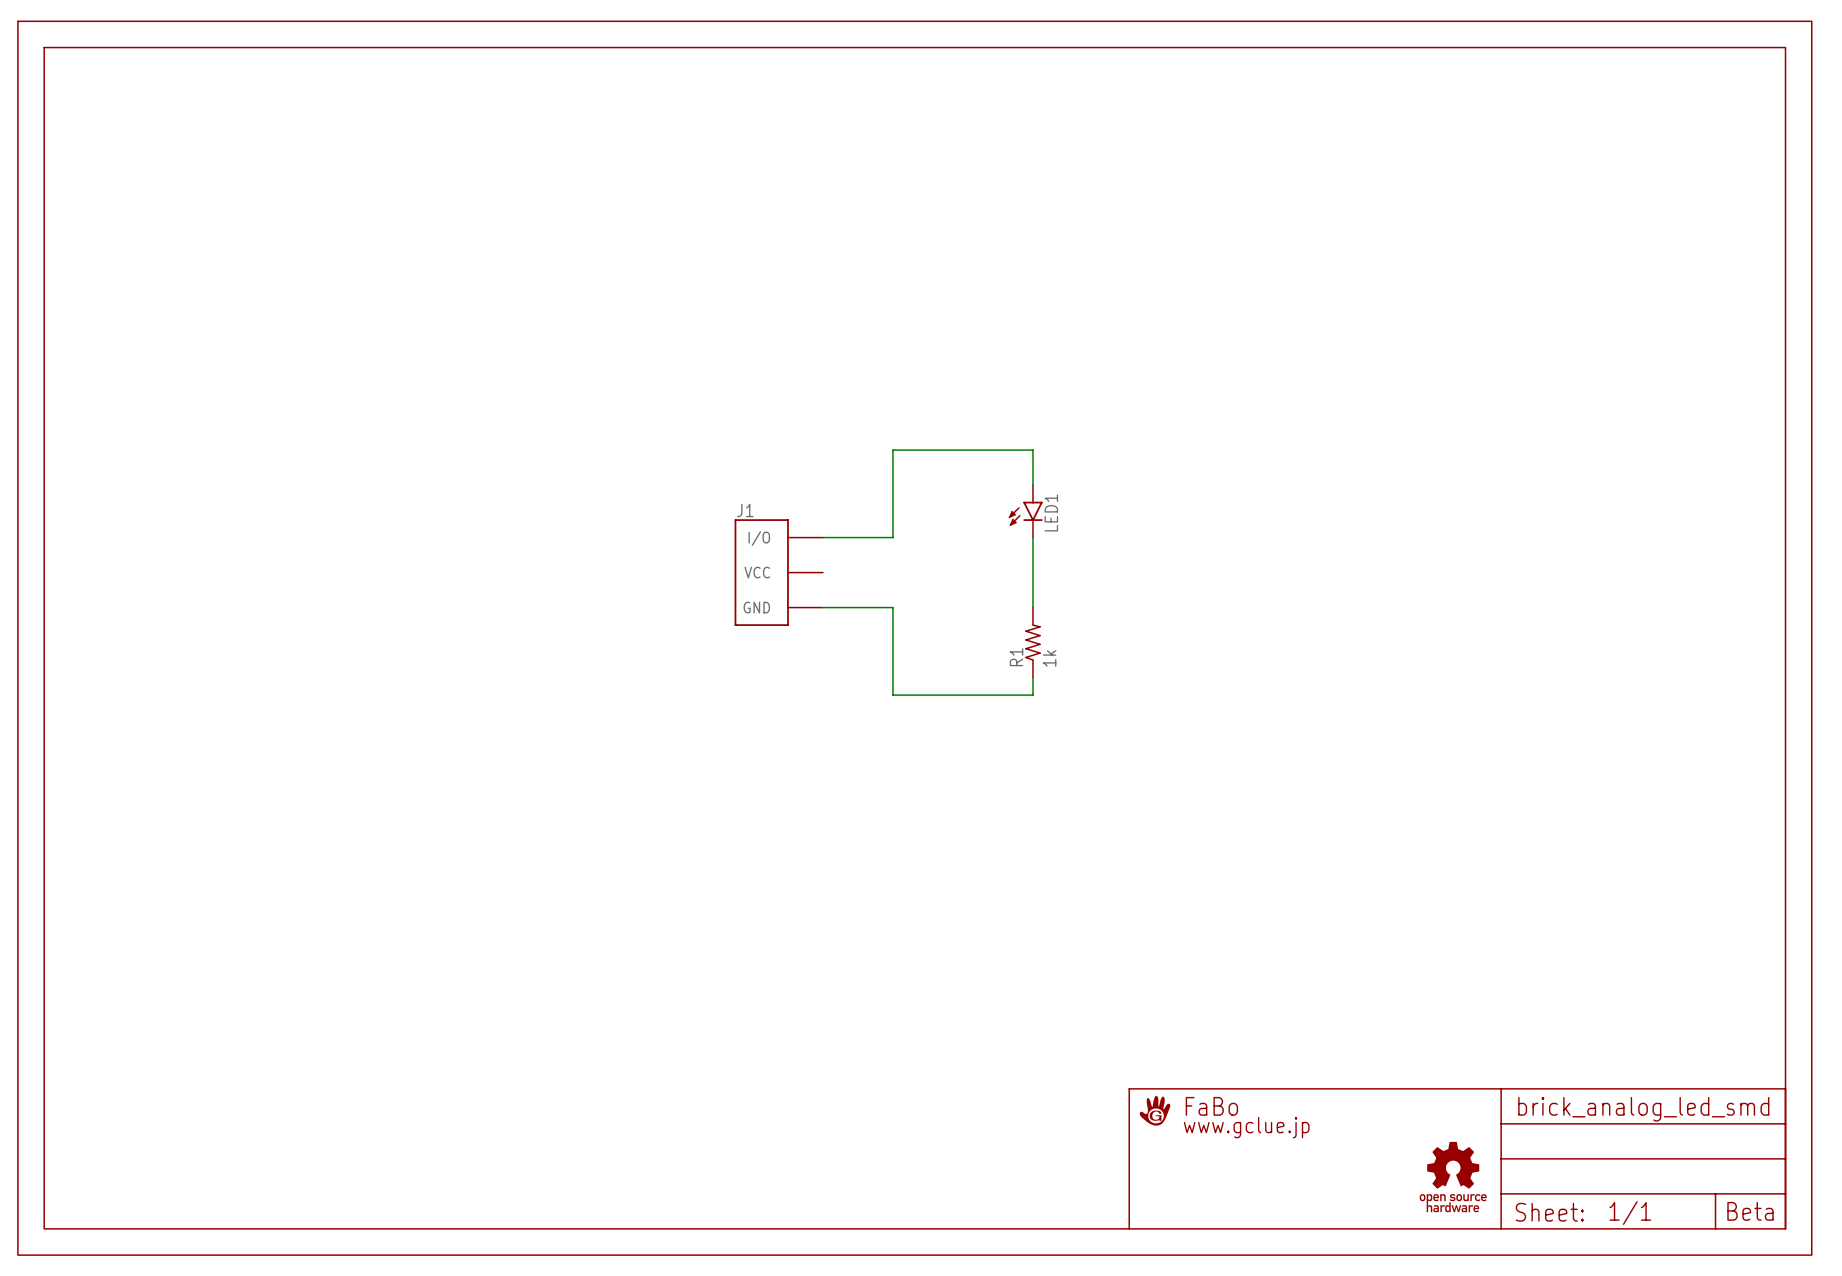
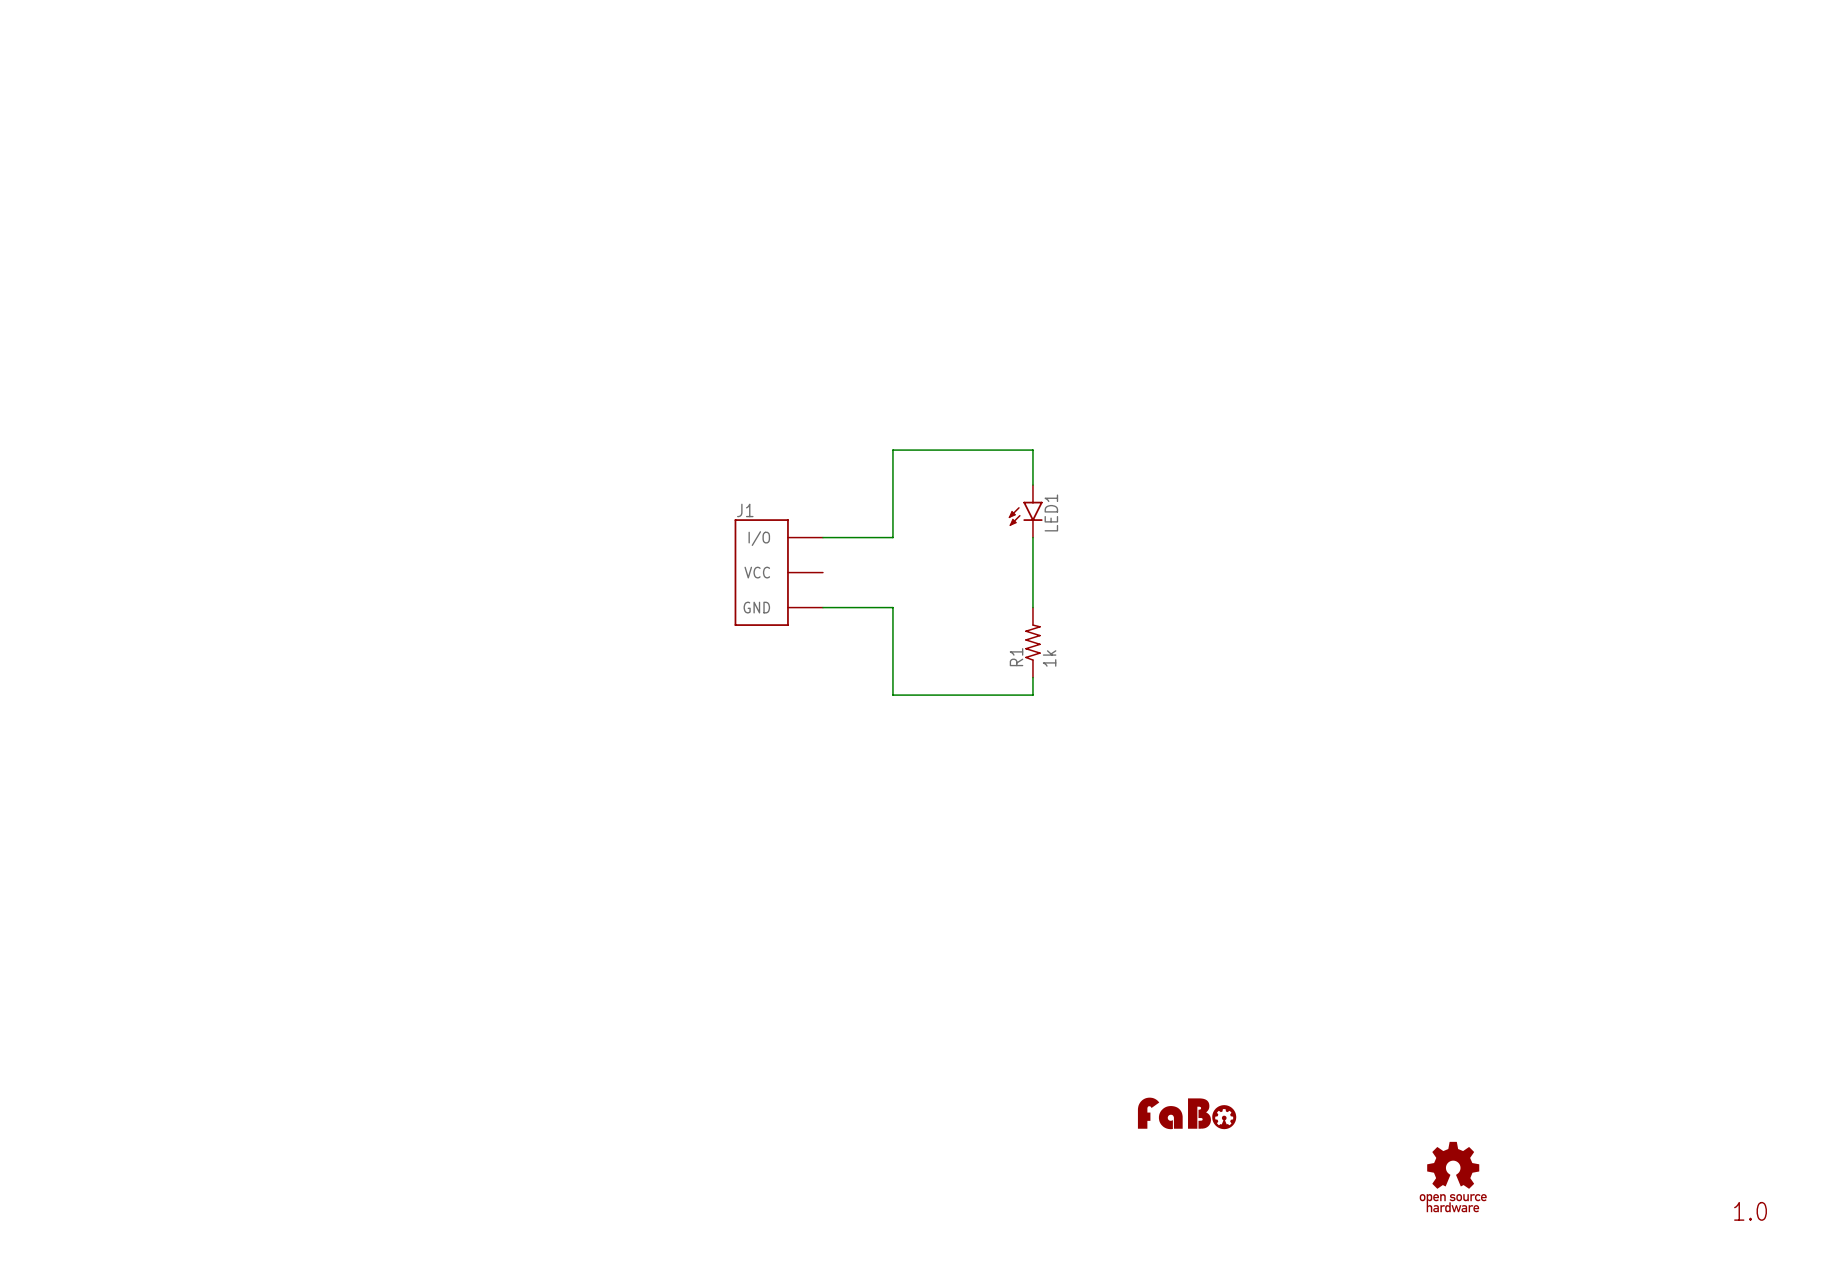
part: (914, 638) -> none
part: none -> (1187, 1113)
text: Beta (1750, 1211) -> 1.0 (1750, 1211)

